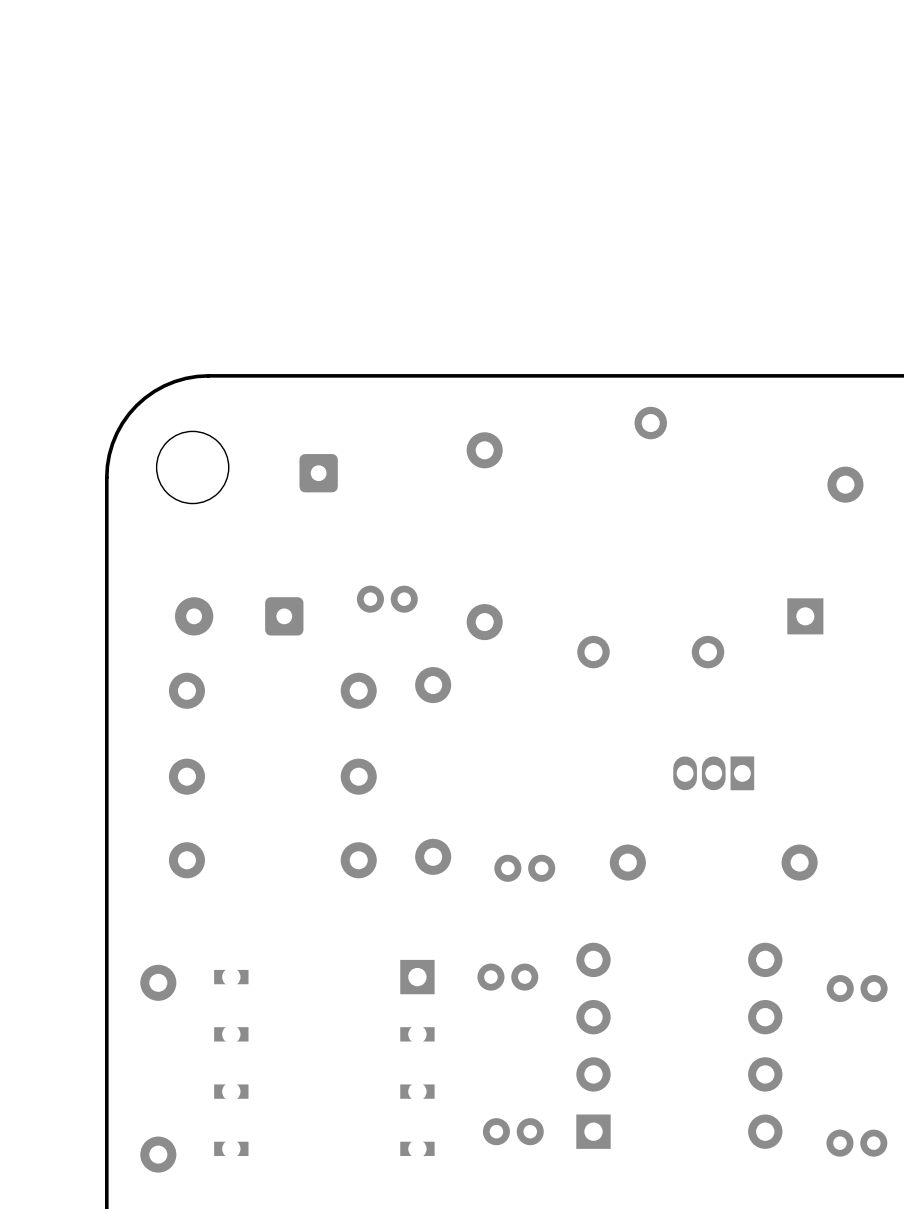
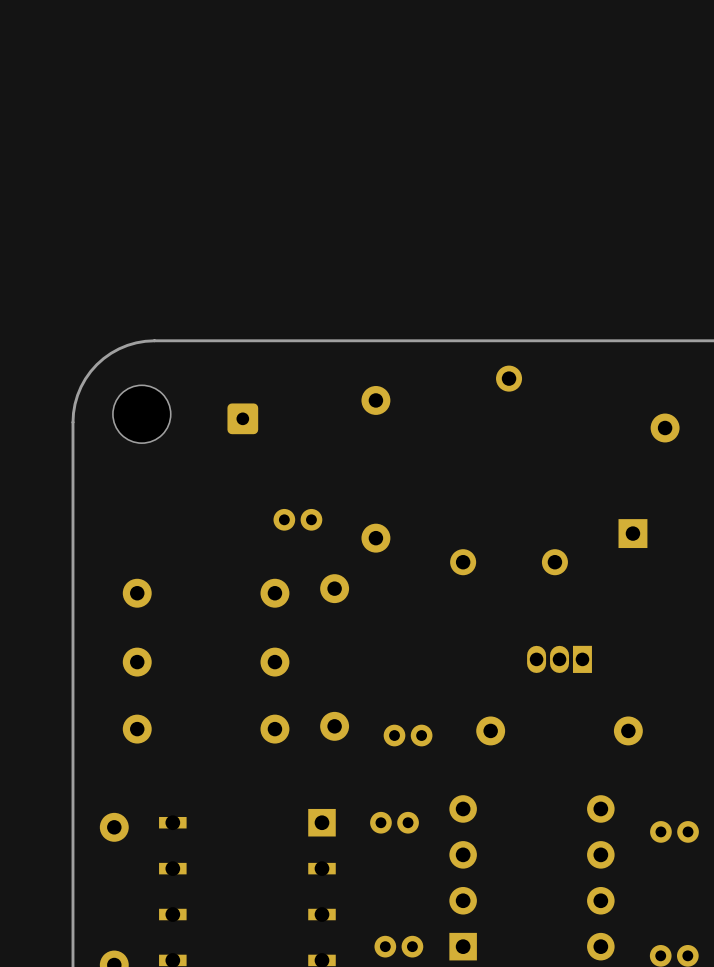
part: (239, 616) -> none

